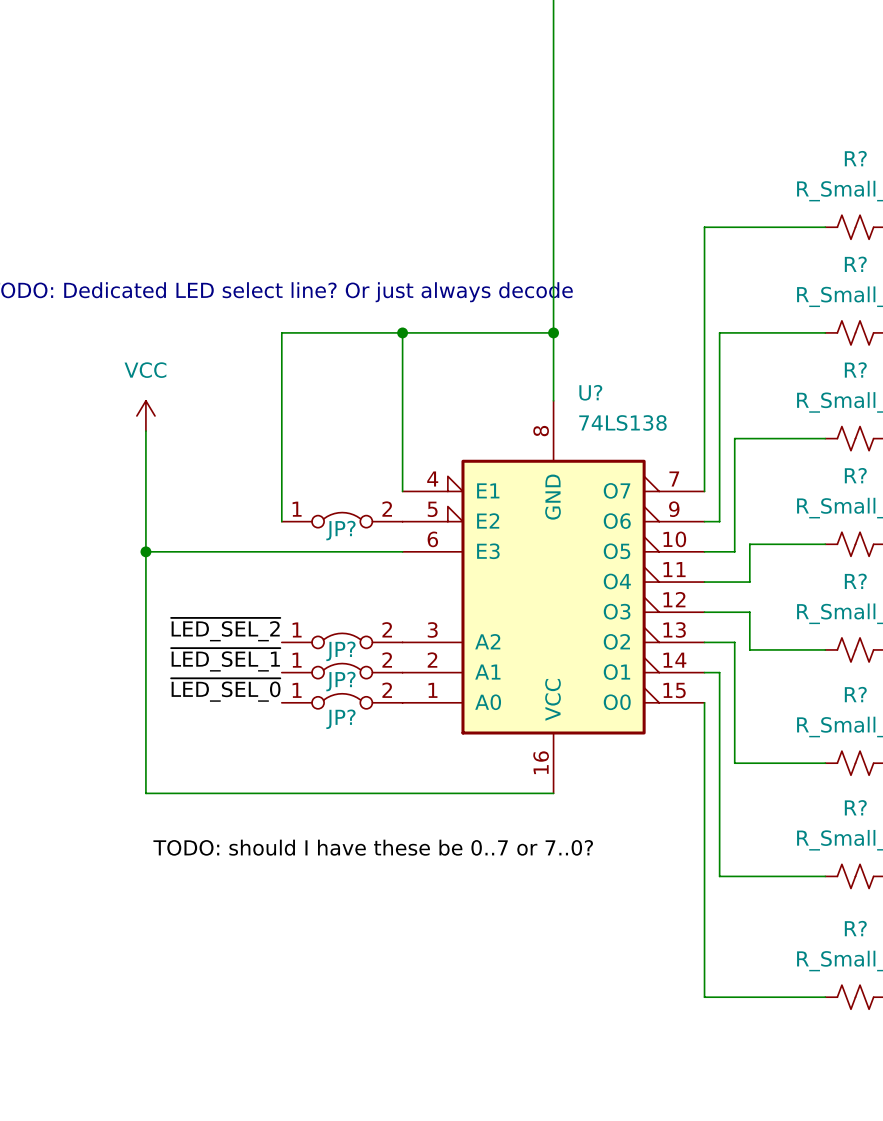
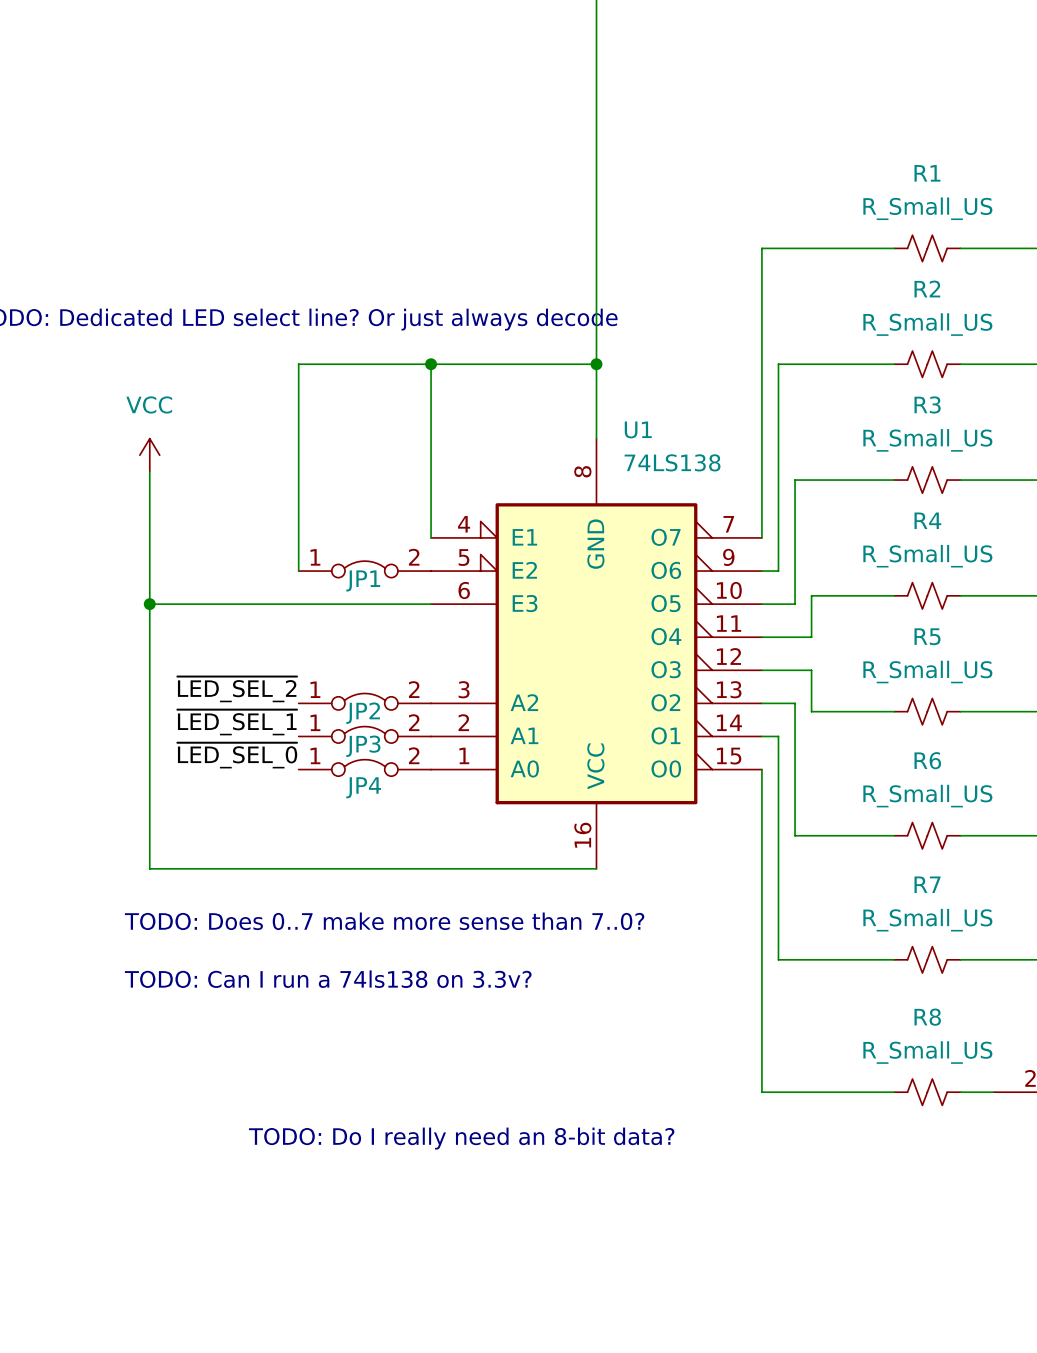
R? name: R? (855, 158) -> R1 (927, 173)
R? name: R? (855, 264) -> R2 (927, 289)
R? name: R? (855, 369) -> R3 (927, 404)
U? name: U? (590, 392) -> U1 (638, 429)
R? name: R? (855, 475) -> R4 (927, 520)
JP? name: JP? (340, 530) -> JP1 (363, 580)
R? name: R? (855, 581) -> R5 (927, 636)
JP? name: JP? (340, 651) -> JP2 (363, 713)
JP? name: JP? (340, 681) -> JP3 (363, 746)
R? name: R? (855, 694) -> R6 (927, 760)
JP? name: JP? (340, 719) -> JP4 (363, 787)
R? name: R? (855, 807) -> R7 (927, 884)
text: none -> TODO: Does 0..7 make more sense than 7..0? (384, 921)
label: TODO: should I have these be 0..7 or 7..0? (373, 847) -> none
text: none -> TODO: Can I run a 74ls138 on 3.3v? (328, 979)
R? name: R? (855, 928) -> R8 (927, 1017)
text: none -> TODO: Do I really need an 8-bit data? (461, 1138)

